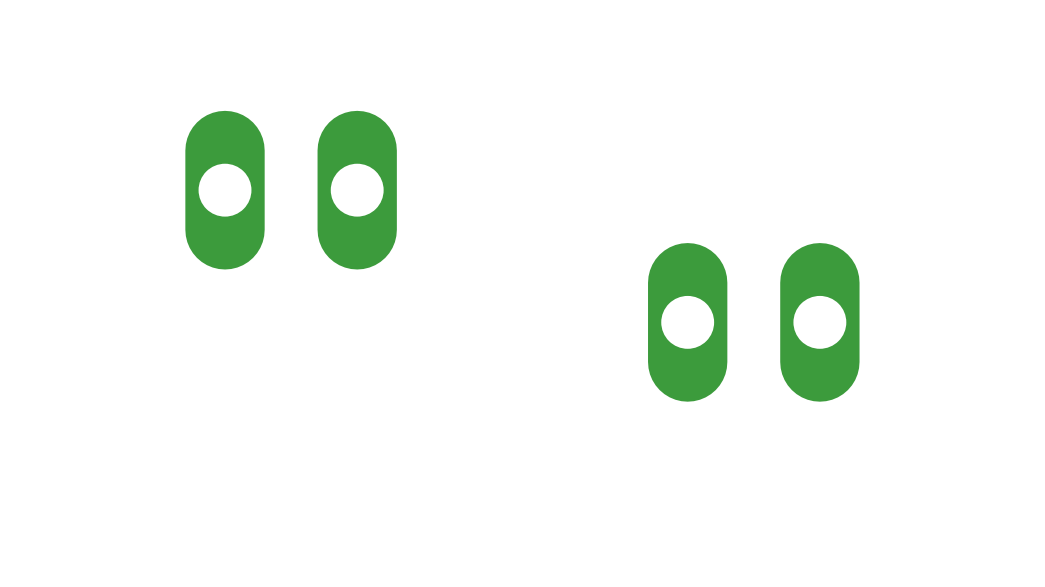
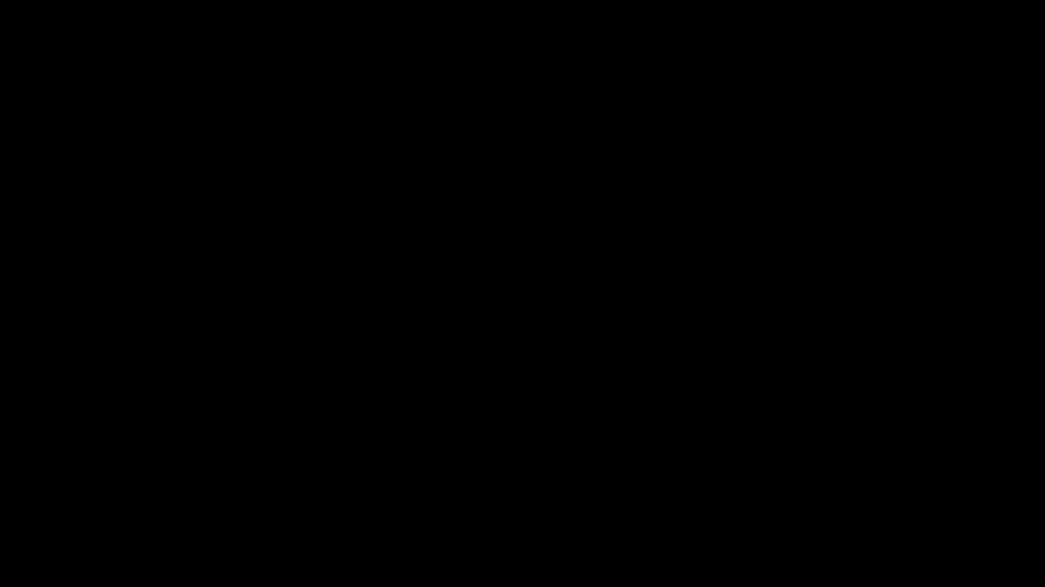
part: (291, 190) -> none
part: (753, 322) -> none

